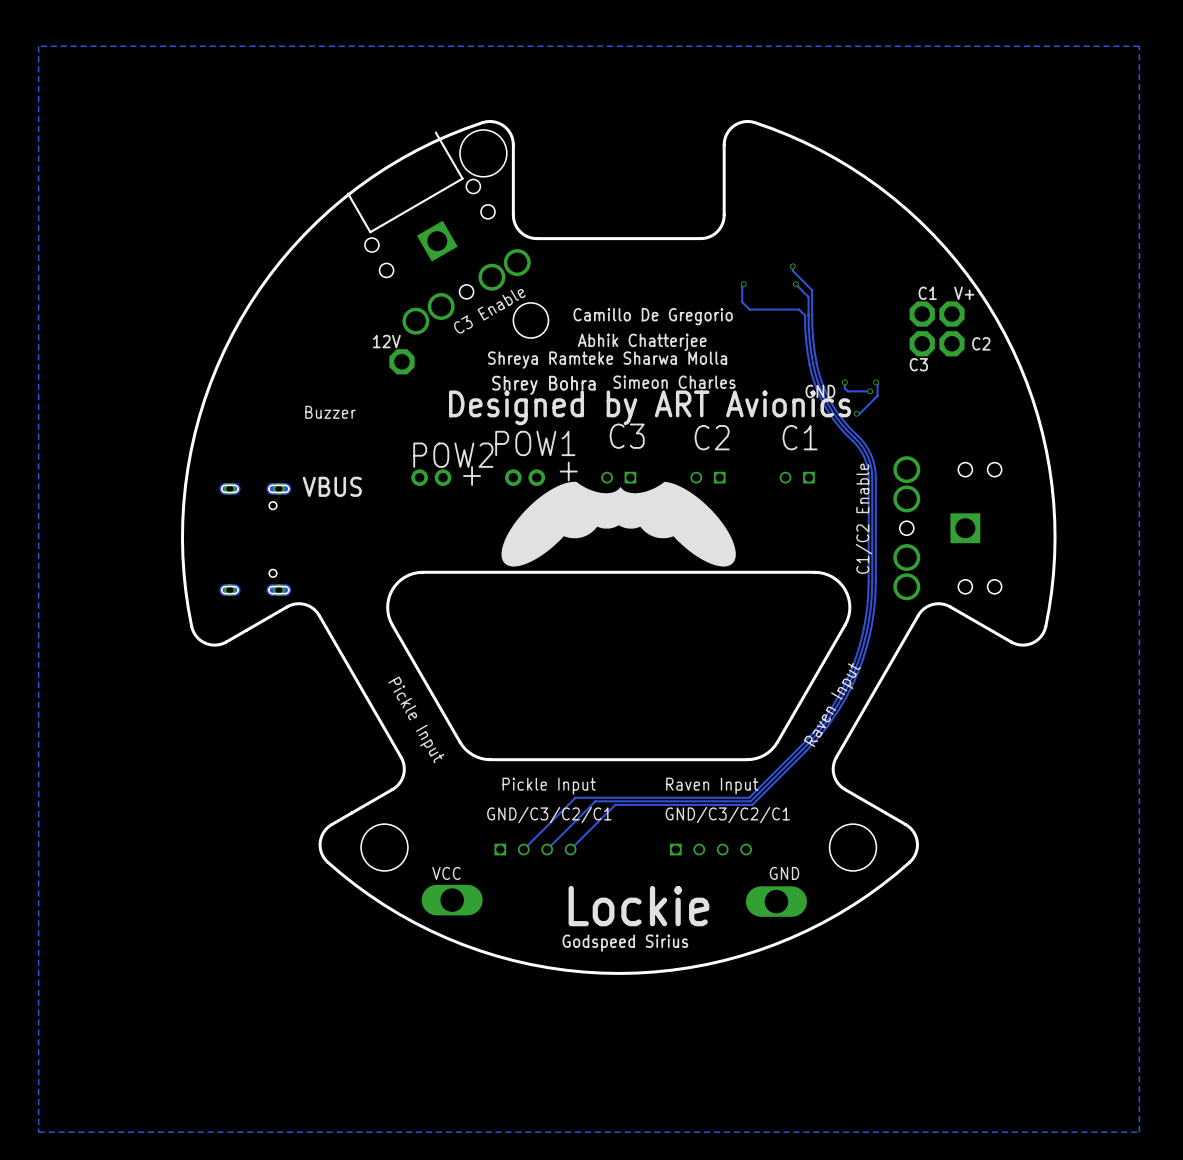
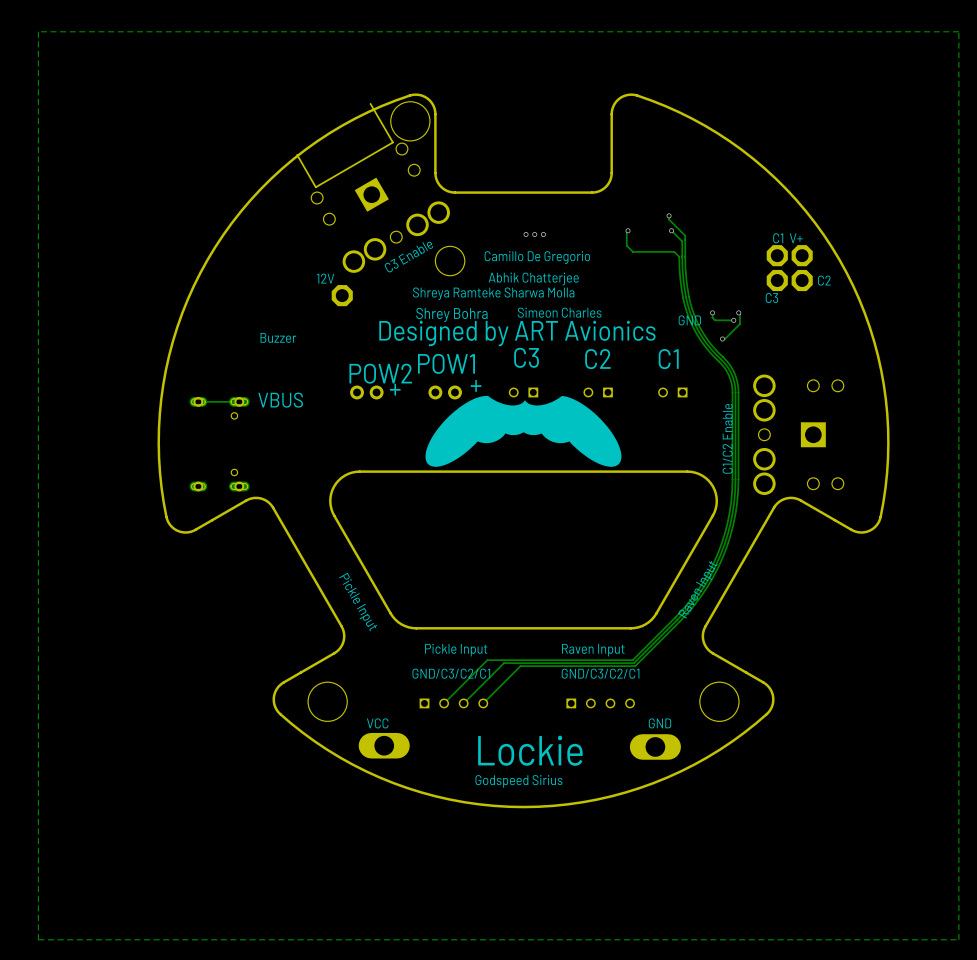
via: none -> (526, 234)
via: none -> (534, 234)
via: none -> (543, 234)
track: none -> (239, 401) (198, 401)

